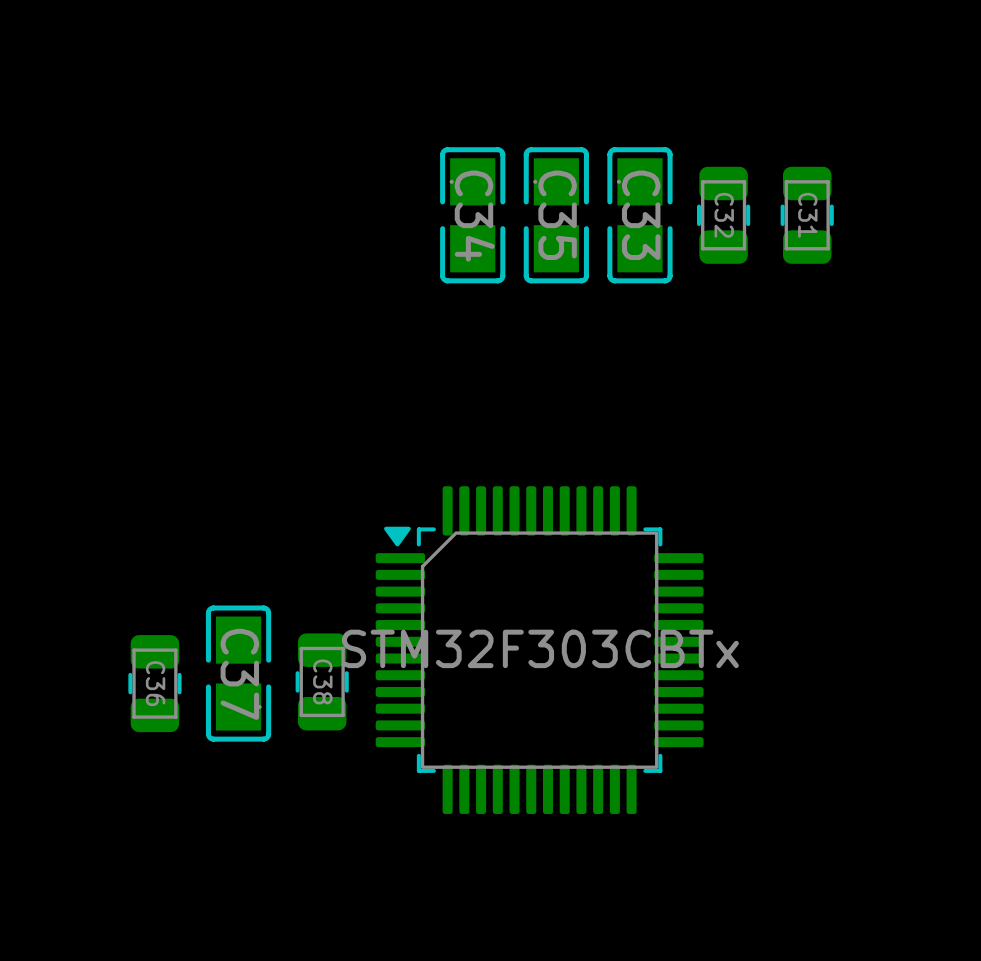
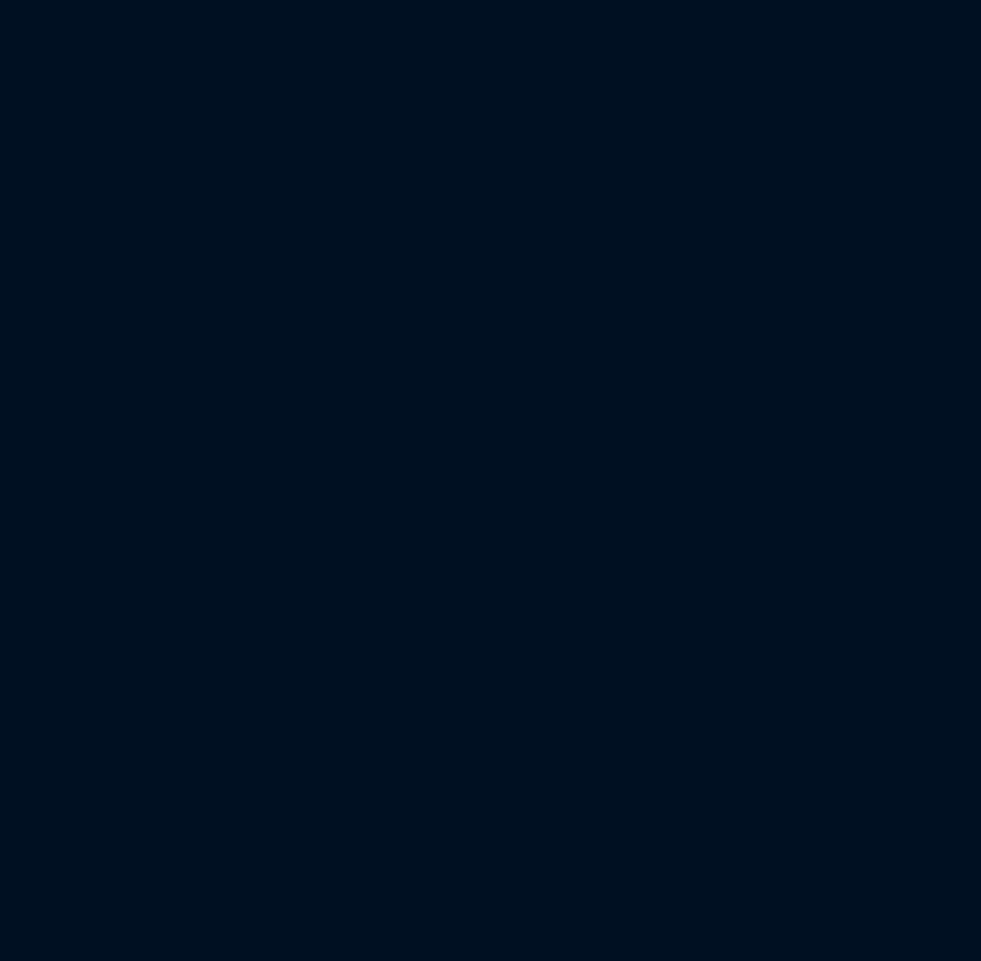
C34: (472, 215) -> none
C35: (556, 215) -> none
C33: (639, 215) -> none
C32: (723, 215) -> none
C31: (807, 215) -> none
part: STM32F303CBTx (539, 650) -> none
C37: (238, 673) -> none
C38: (322, 681) -> none
C36: (154, 683) -> none

